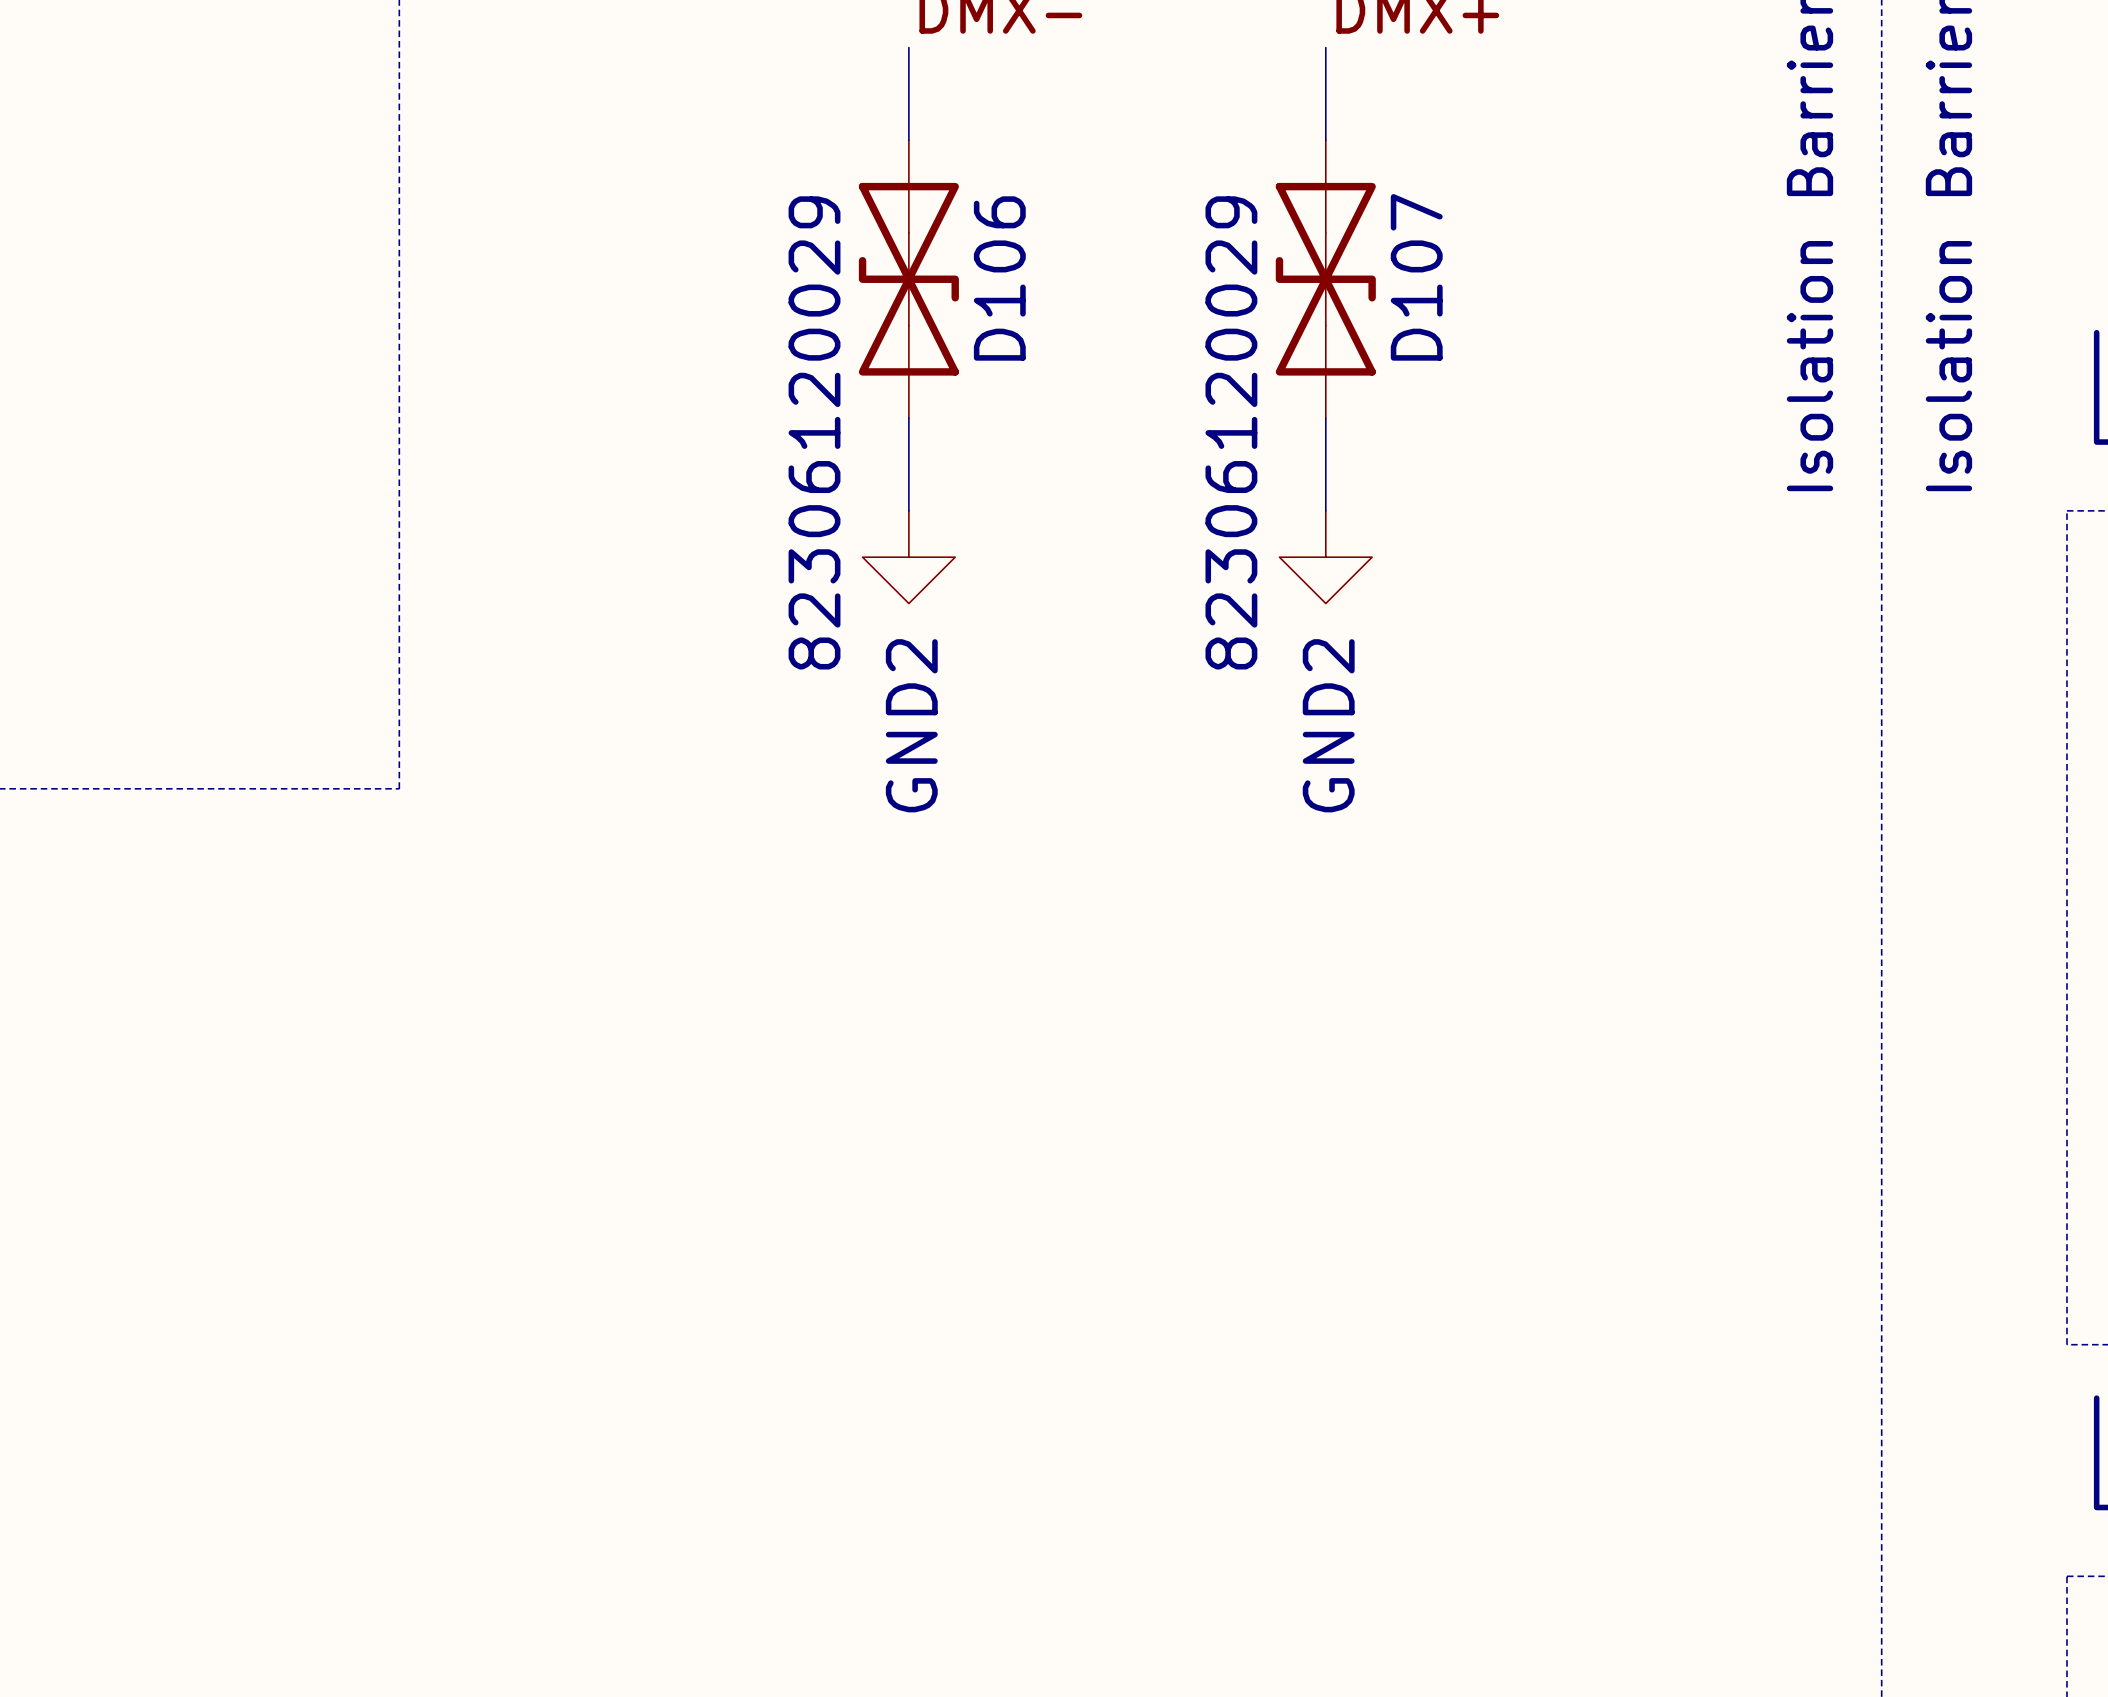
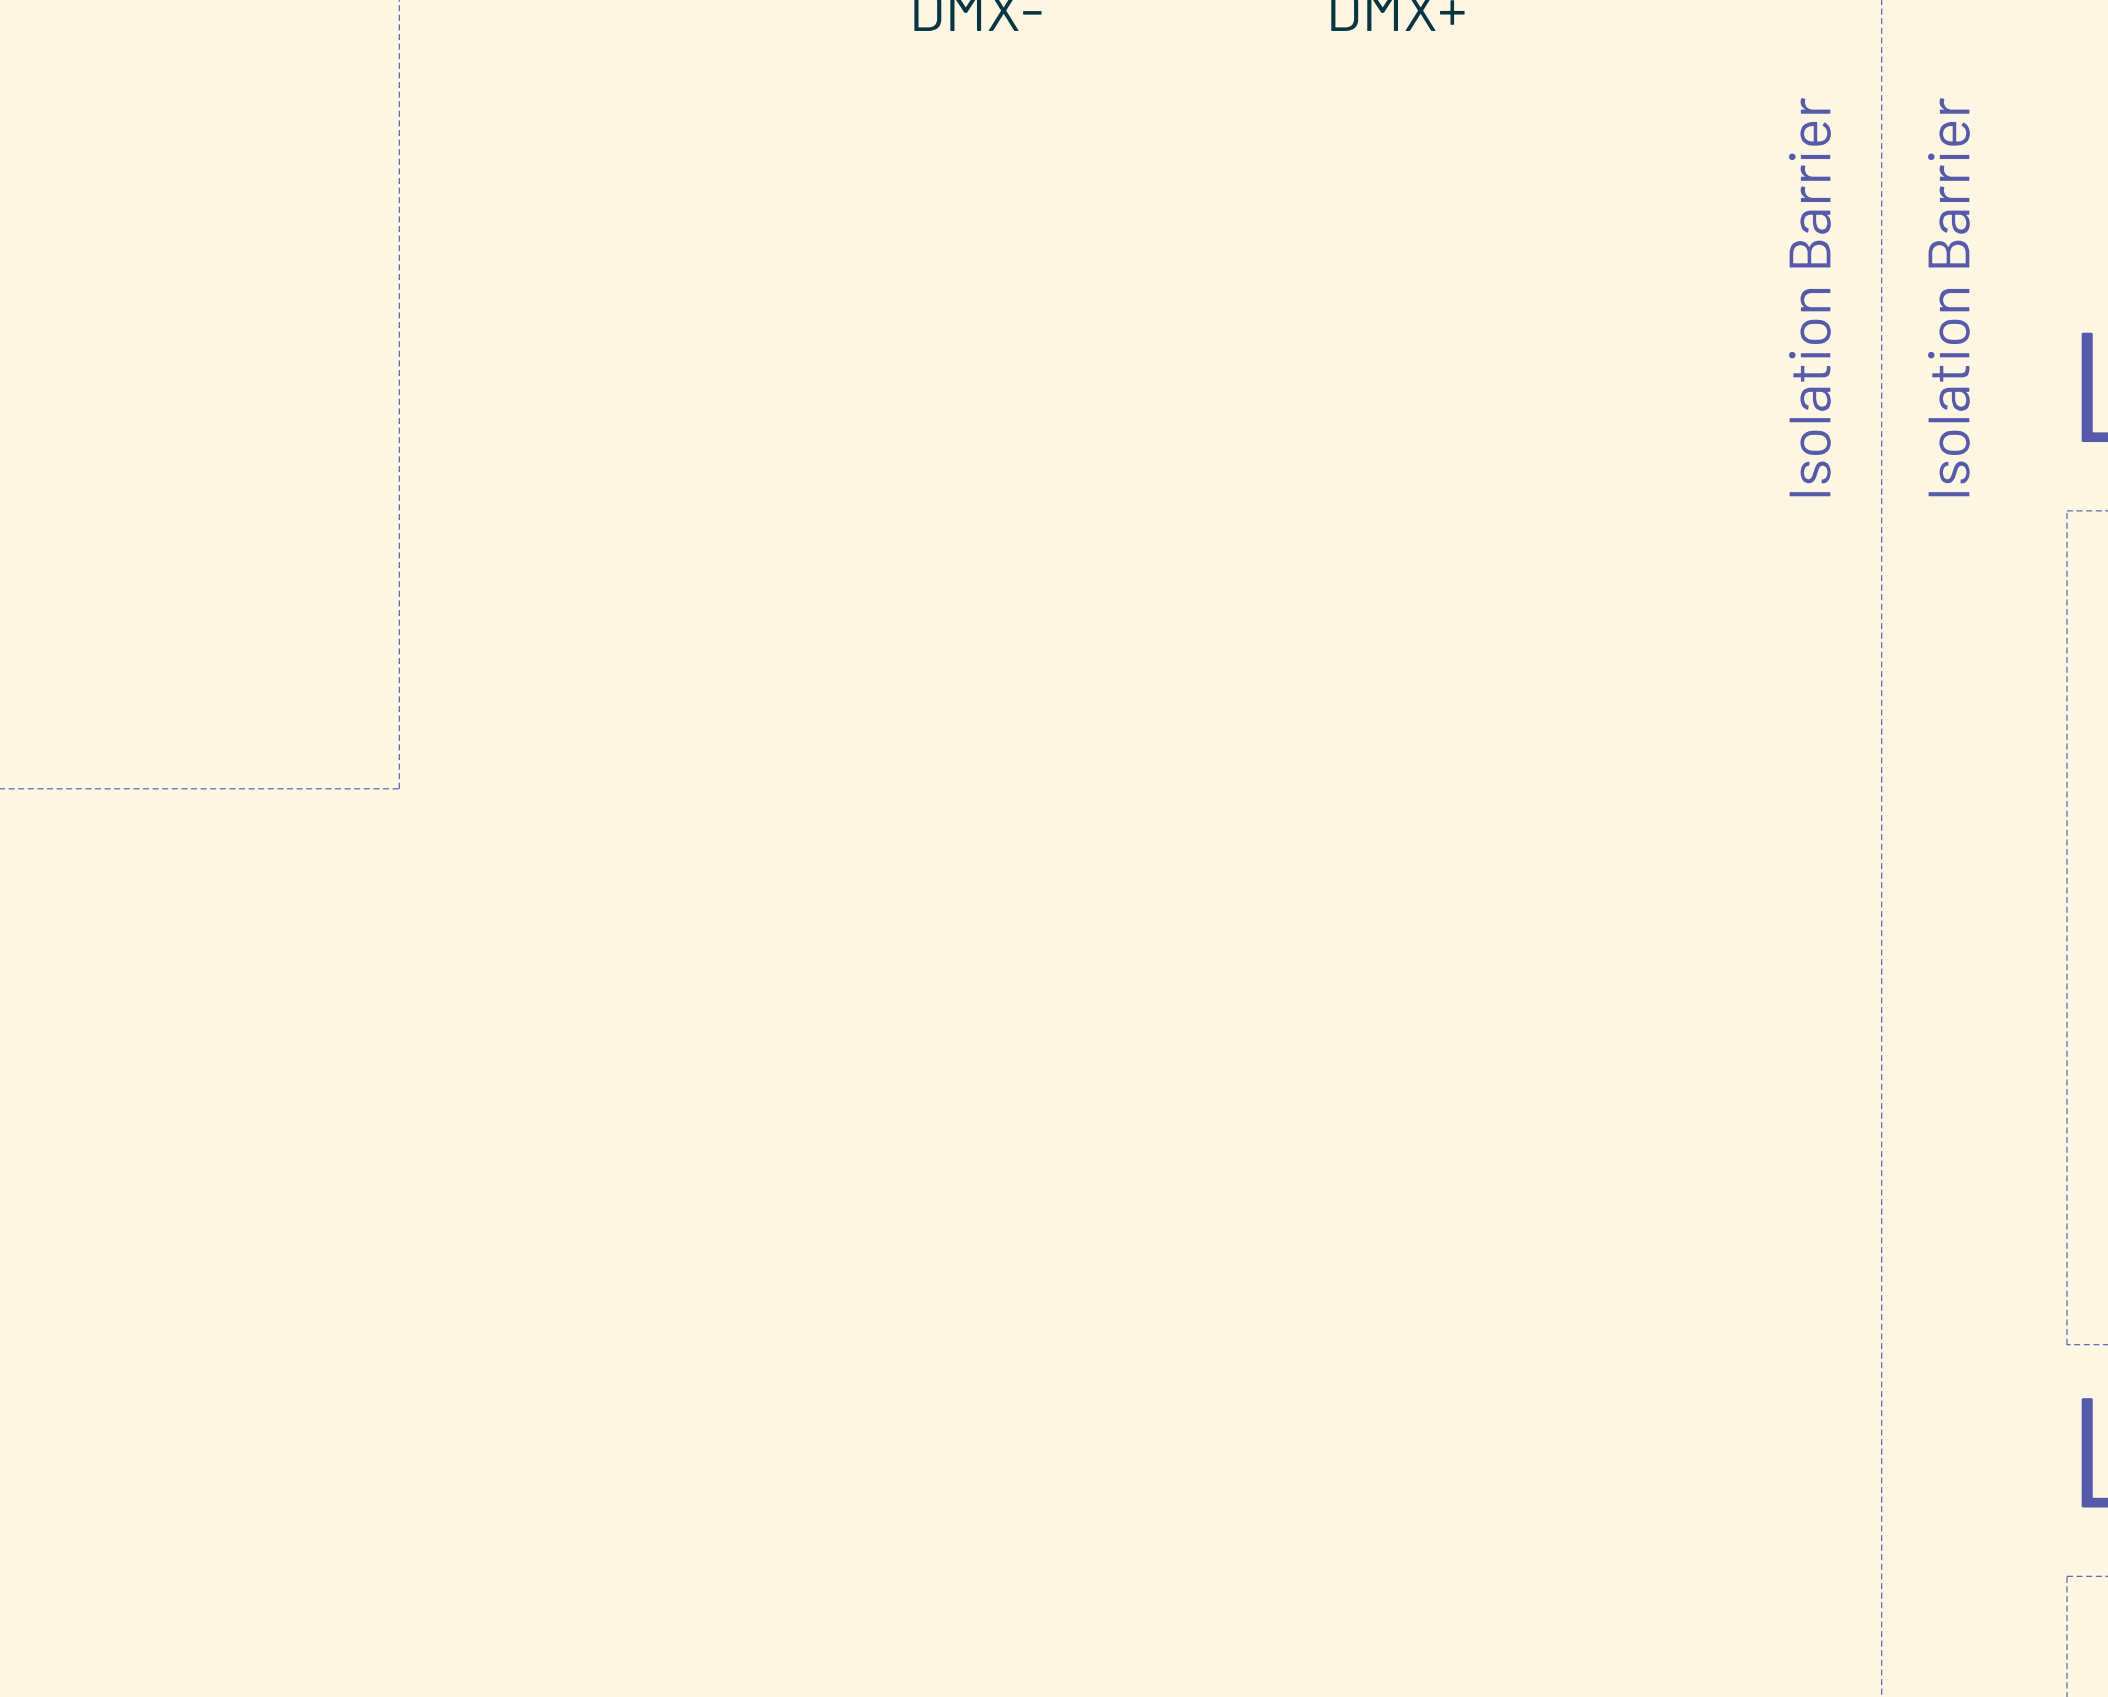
wire: (908, 47) (908, 140) -> none
wire: (1325, 47) (1325, 140) -> none
D106: 82306120029 (908, 279) -> none
D107: 82306120029 (1325, 279) -> none
wire: (908, 418) (908, 510) -> none
wire: (1325, 418) (1325, 510) -> none
power symbol: GND2 (908, 557) -> none
power symbol: GND2 (1325, 557) -> none

